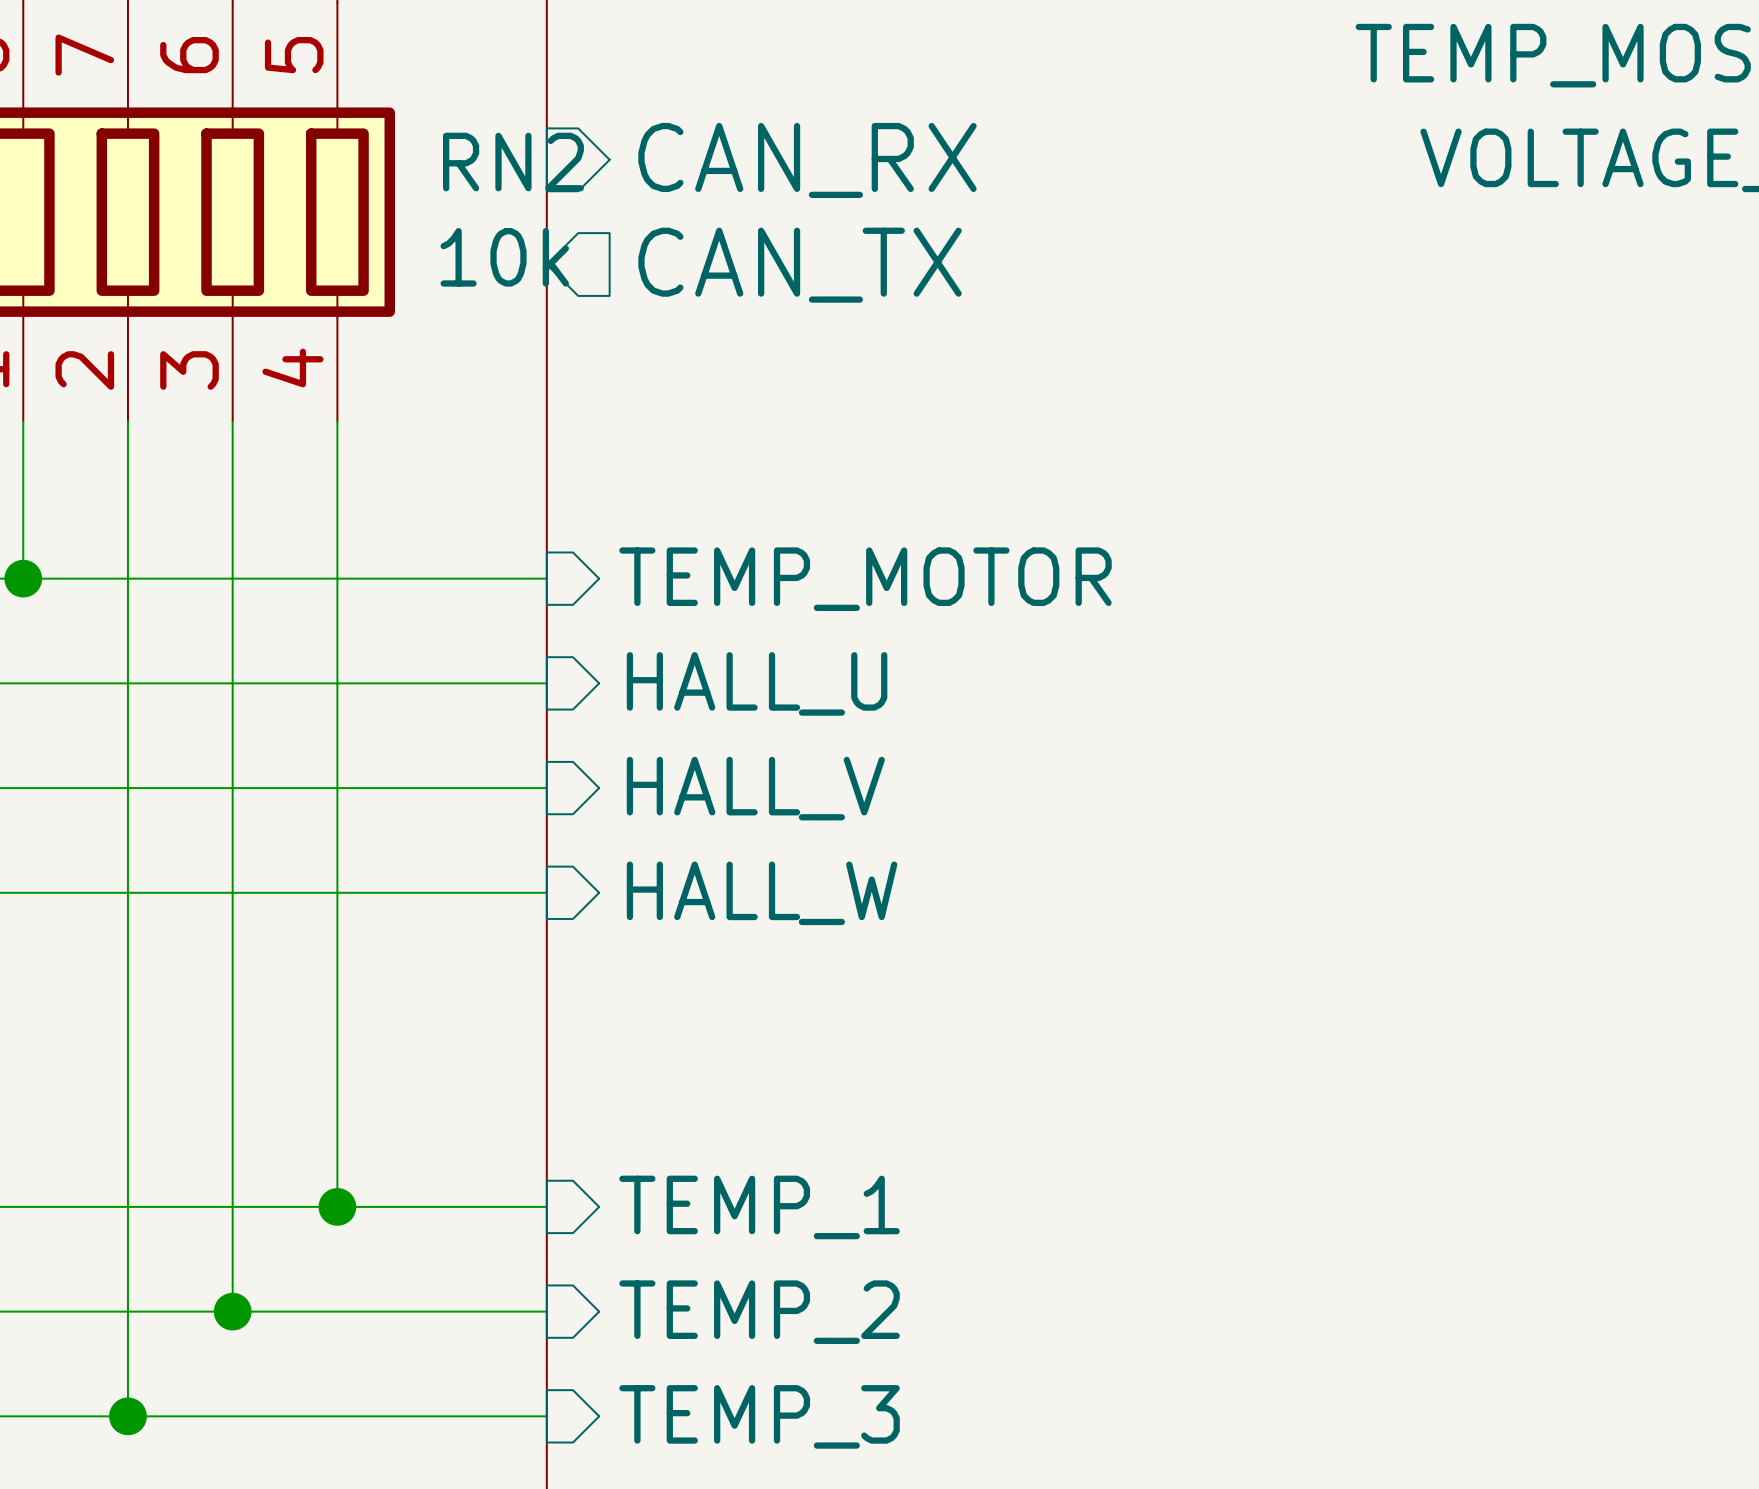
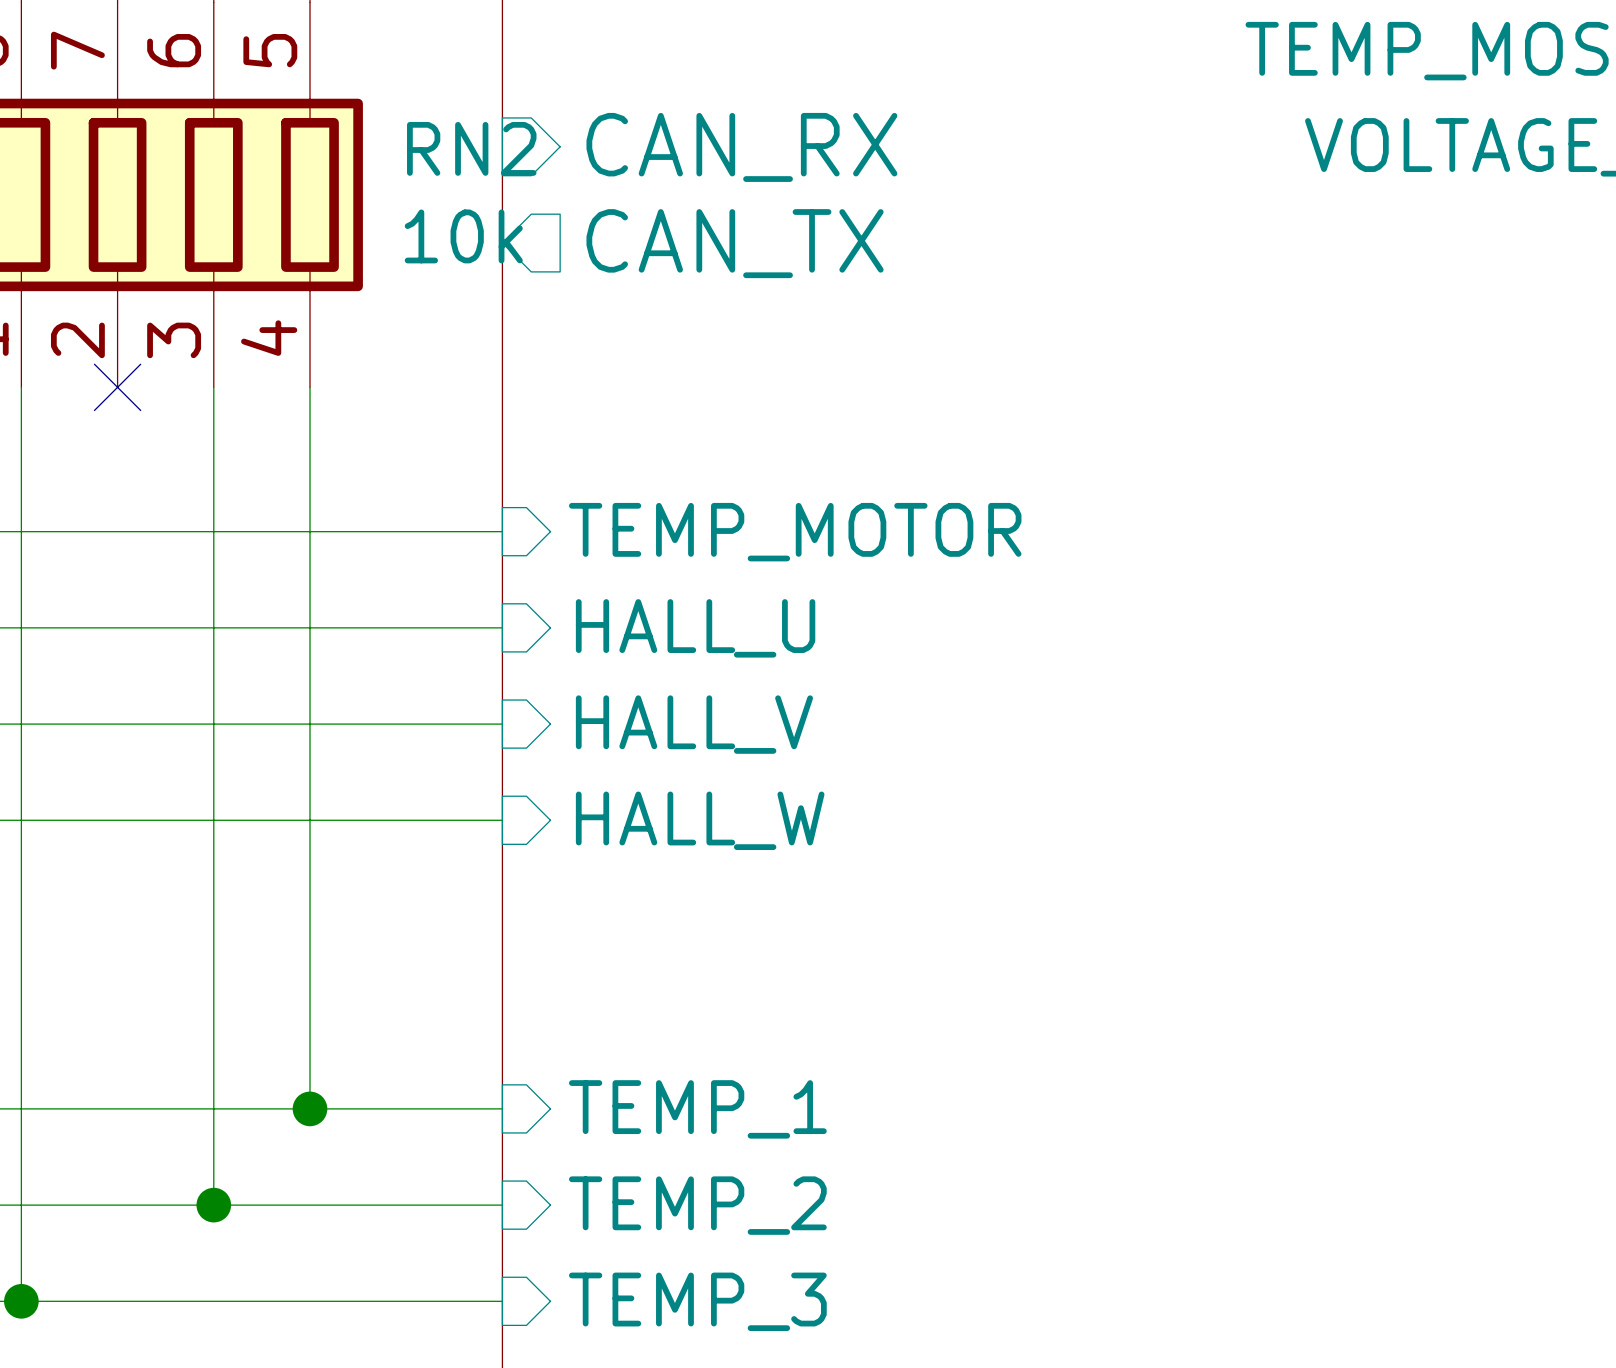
wire: (127, 421) (127, 1416) -> none
no-connect mark: none -> (117, 387)
wire: none -> (21, 531) (21, 1301)
junction: (23, 578) -> none
junction position: (127, 1416) -> (21, 1301)

